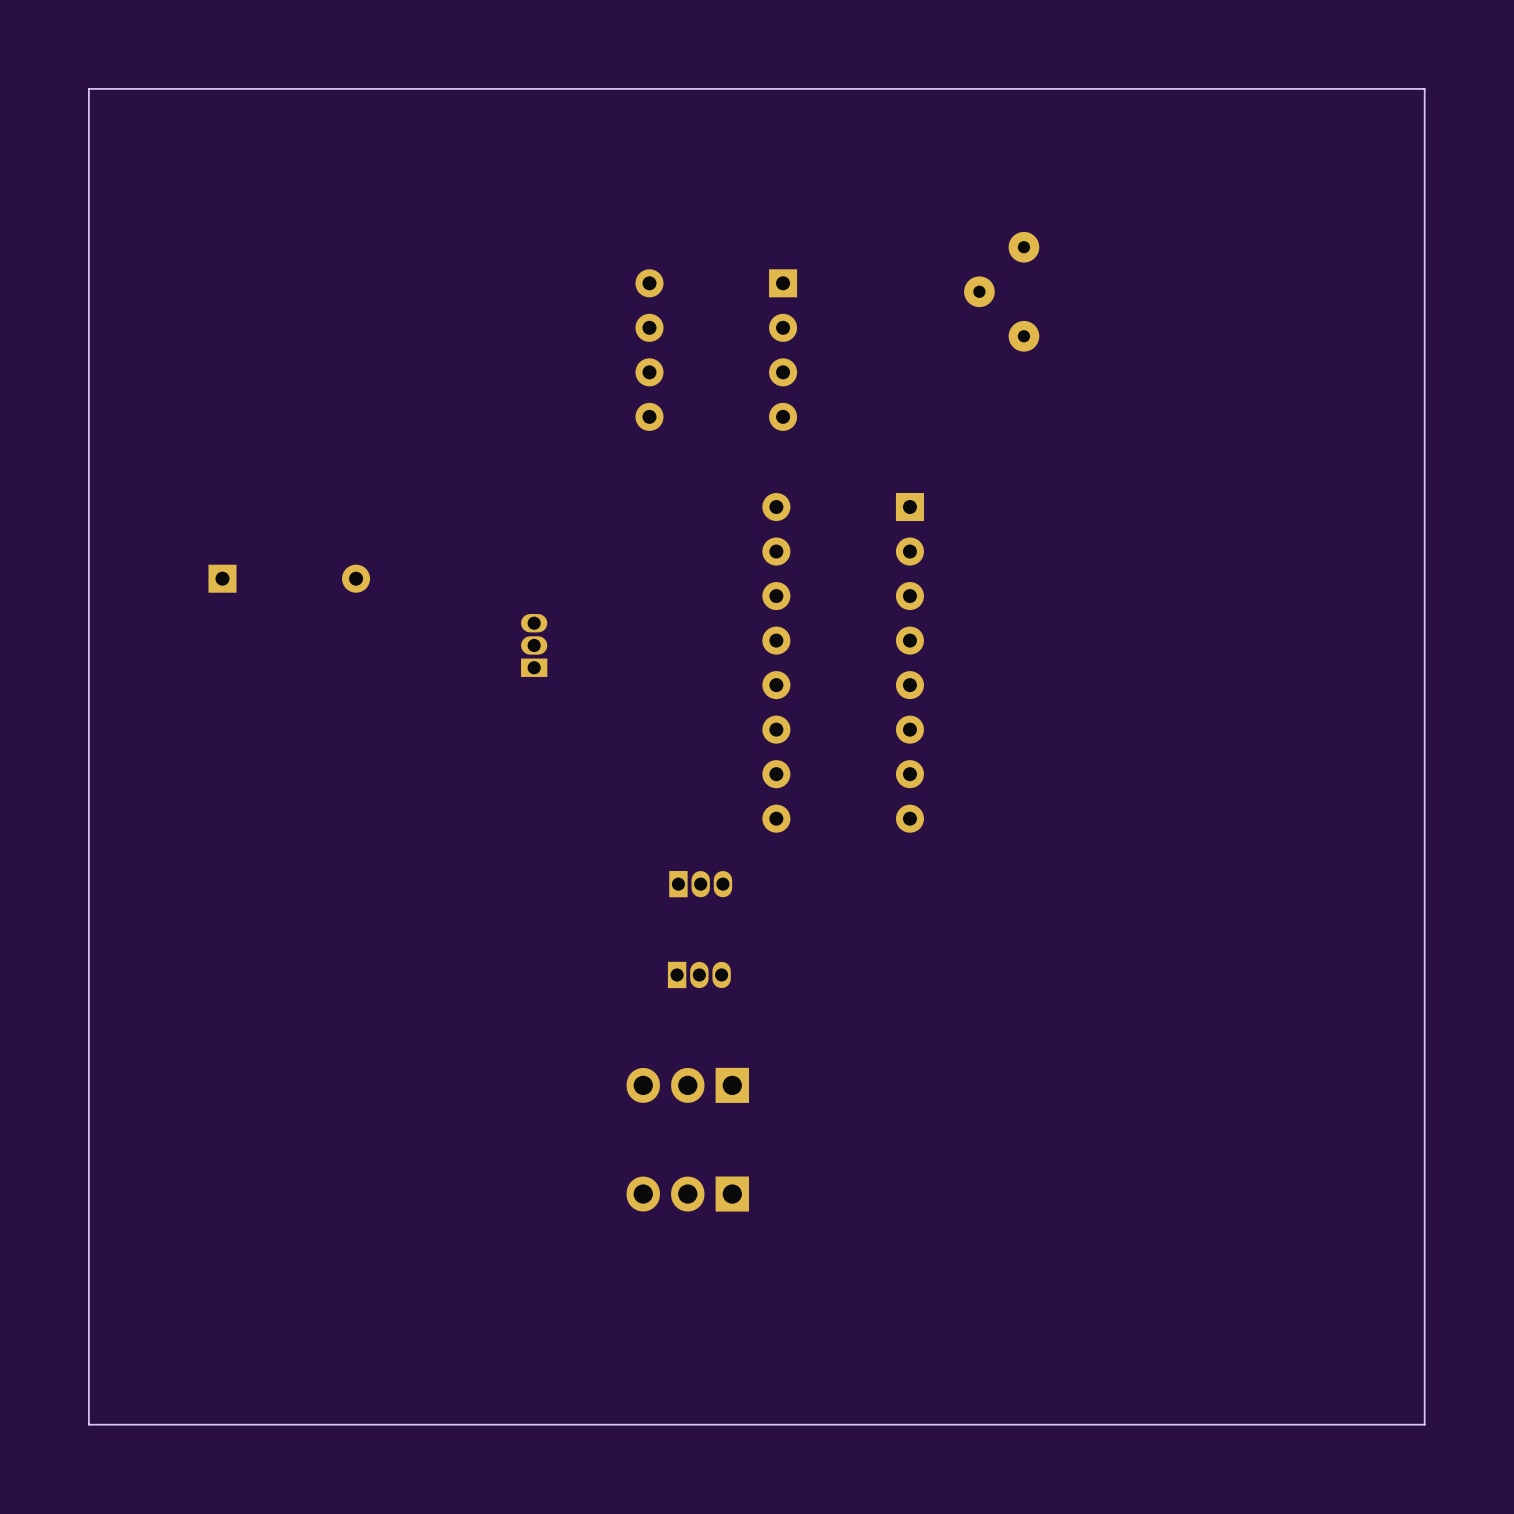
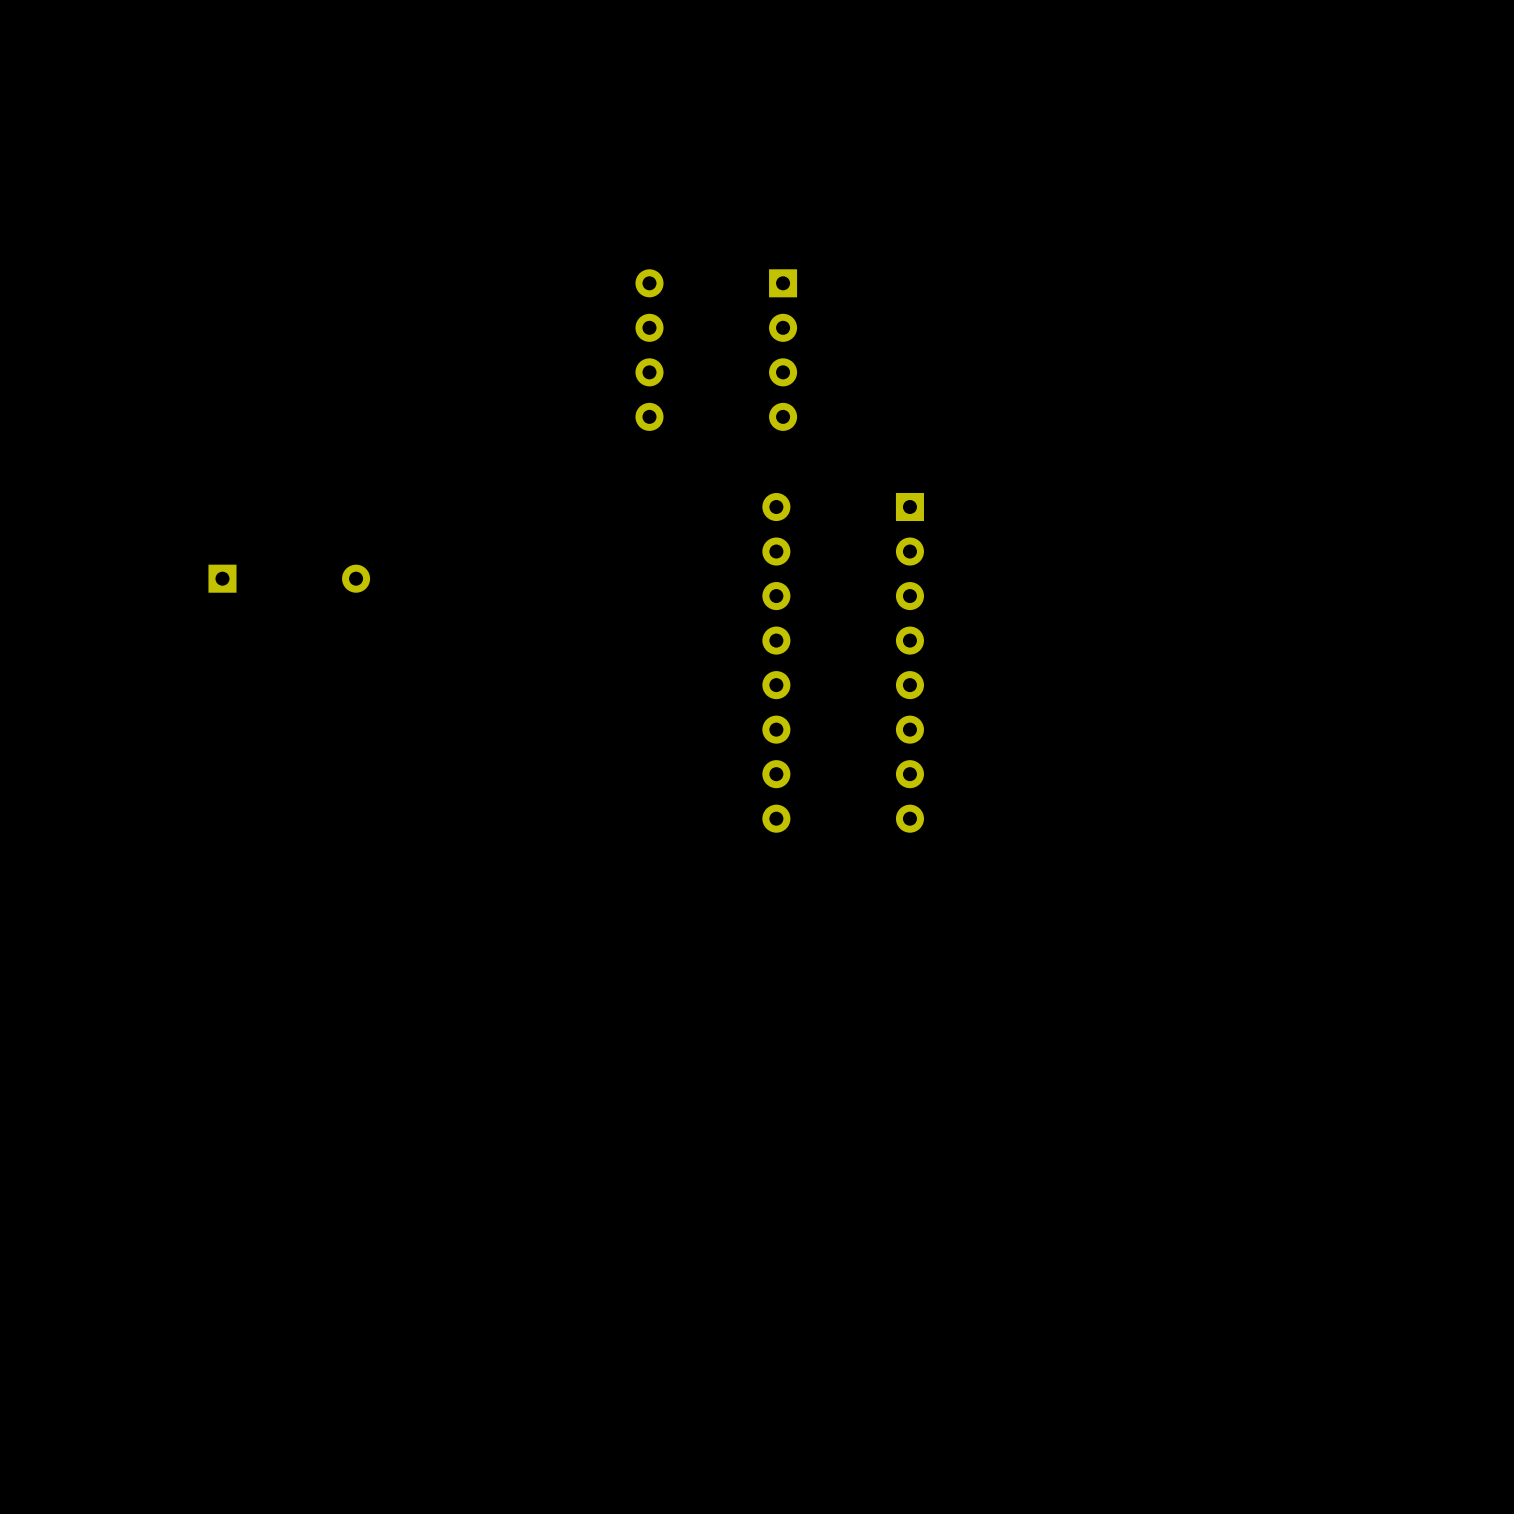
board edge: (1424, 88) (88, 88) (88, 1424) (1424, 1424) (1424, 88) -> none
part: (1001, 291) -> none
part: (534, 645) -> none
part: (700, 884) -> none
part: (699, 974) -> none
part: (687, 1085) -> none
part: (687, 1194) -> none

